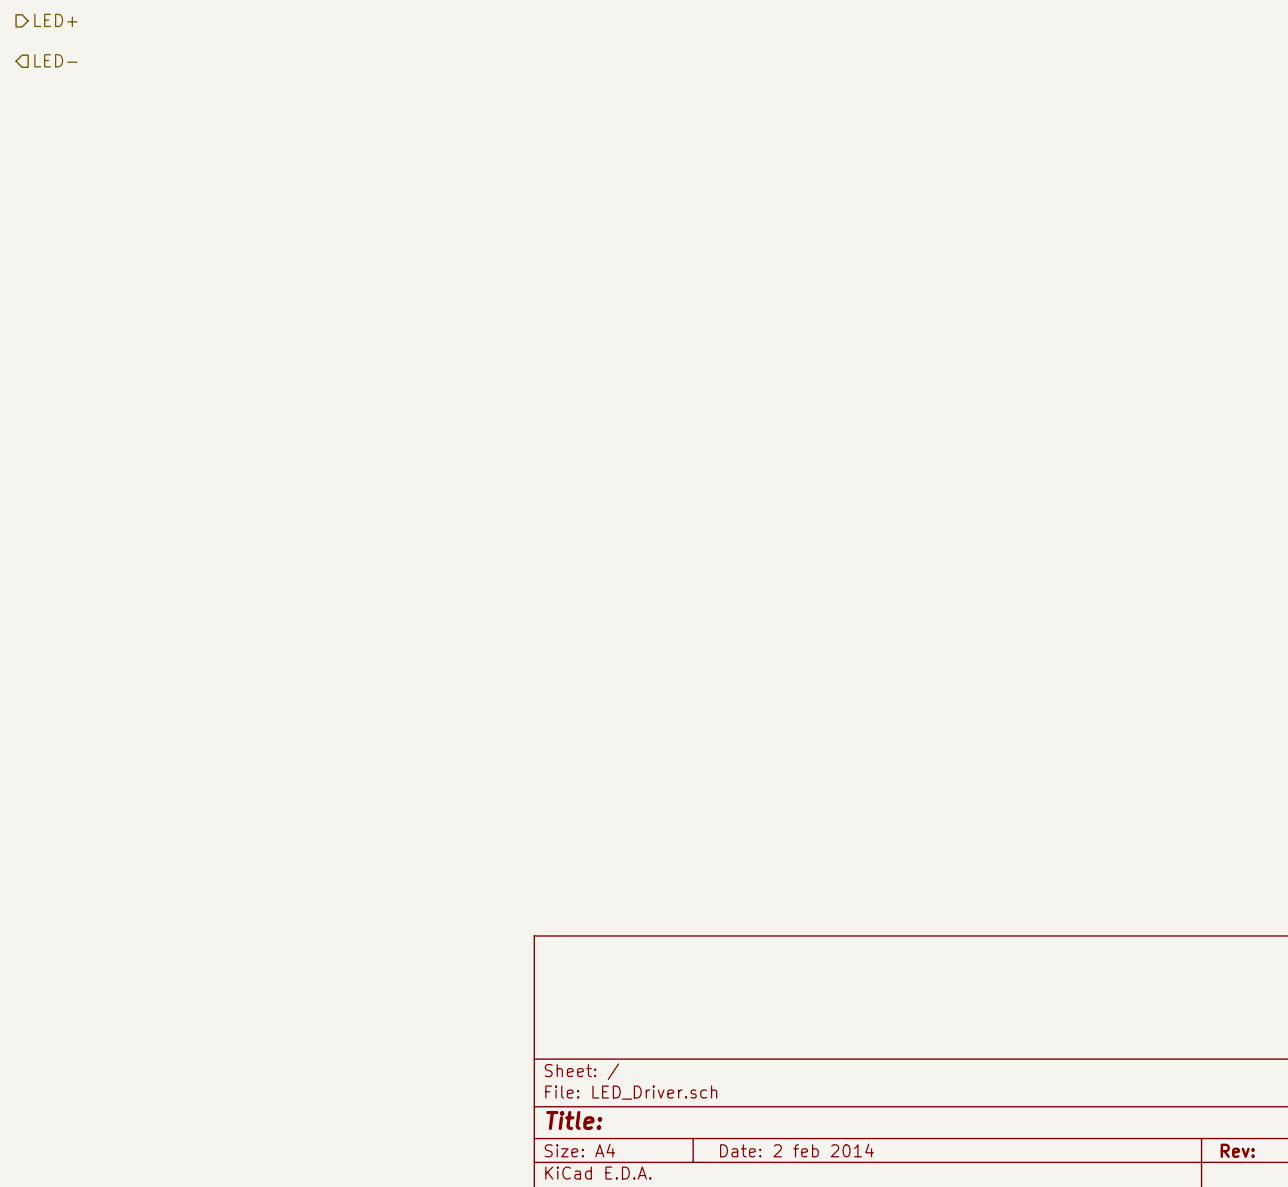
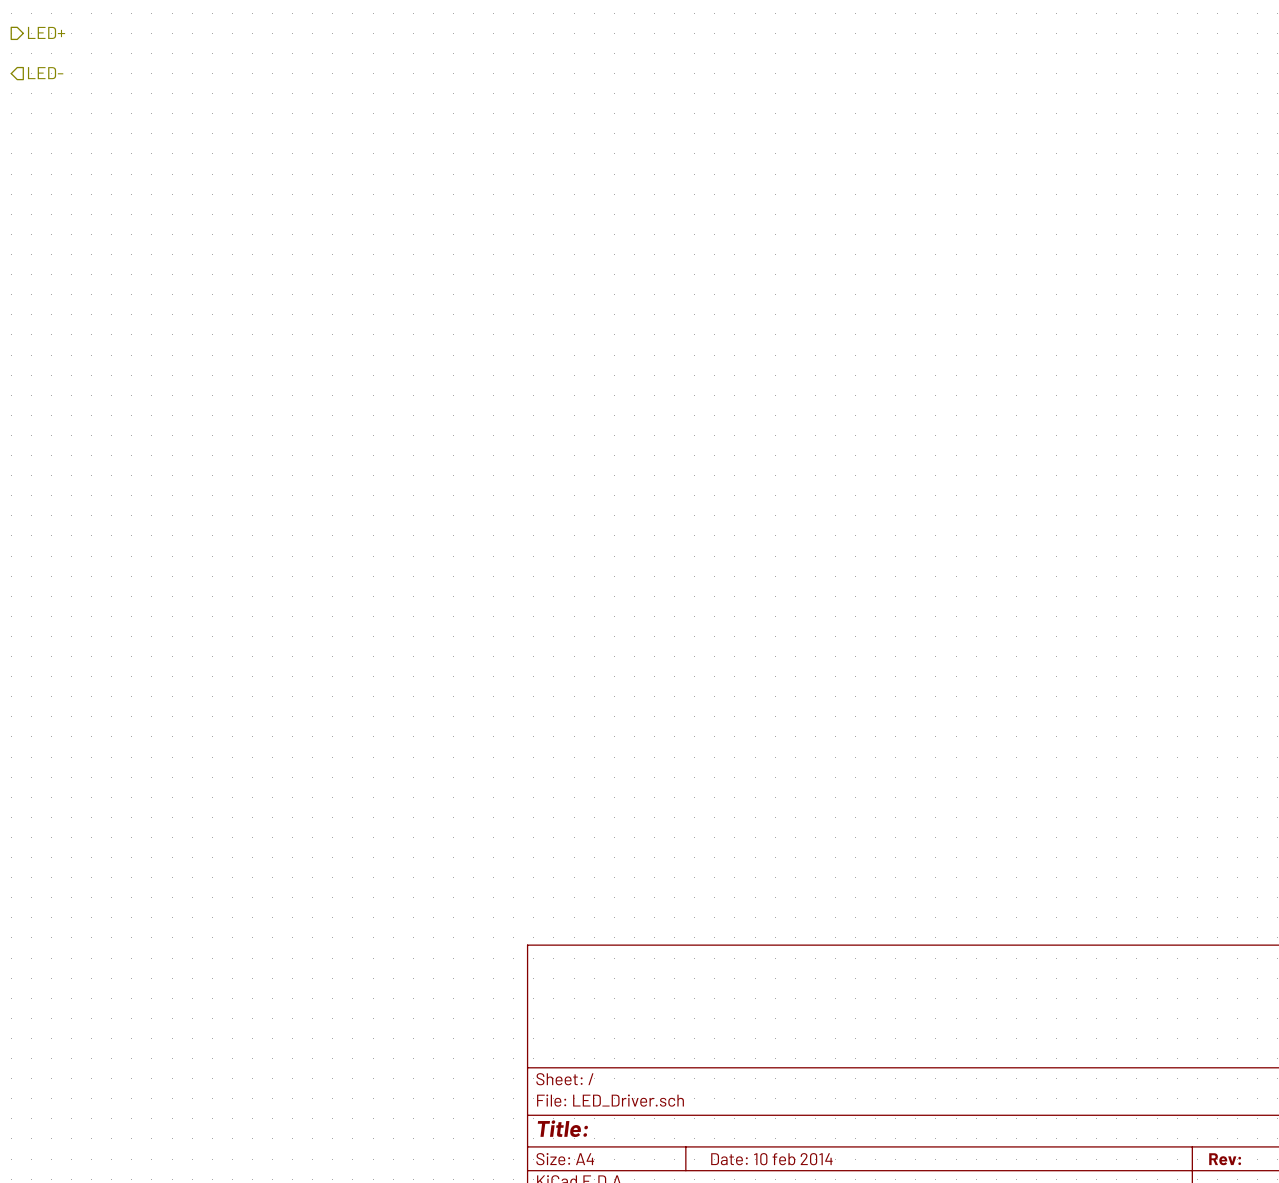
title block: Date: 2 feb 2014 (796, 1150) -> Date: 10 feb 2014 (771, 1159)

